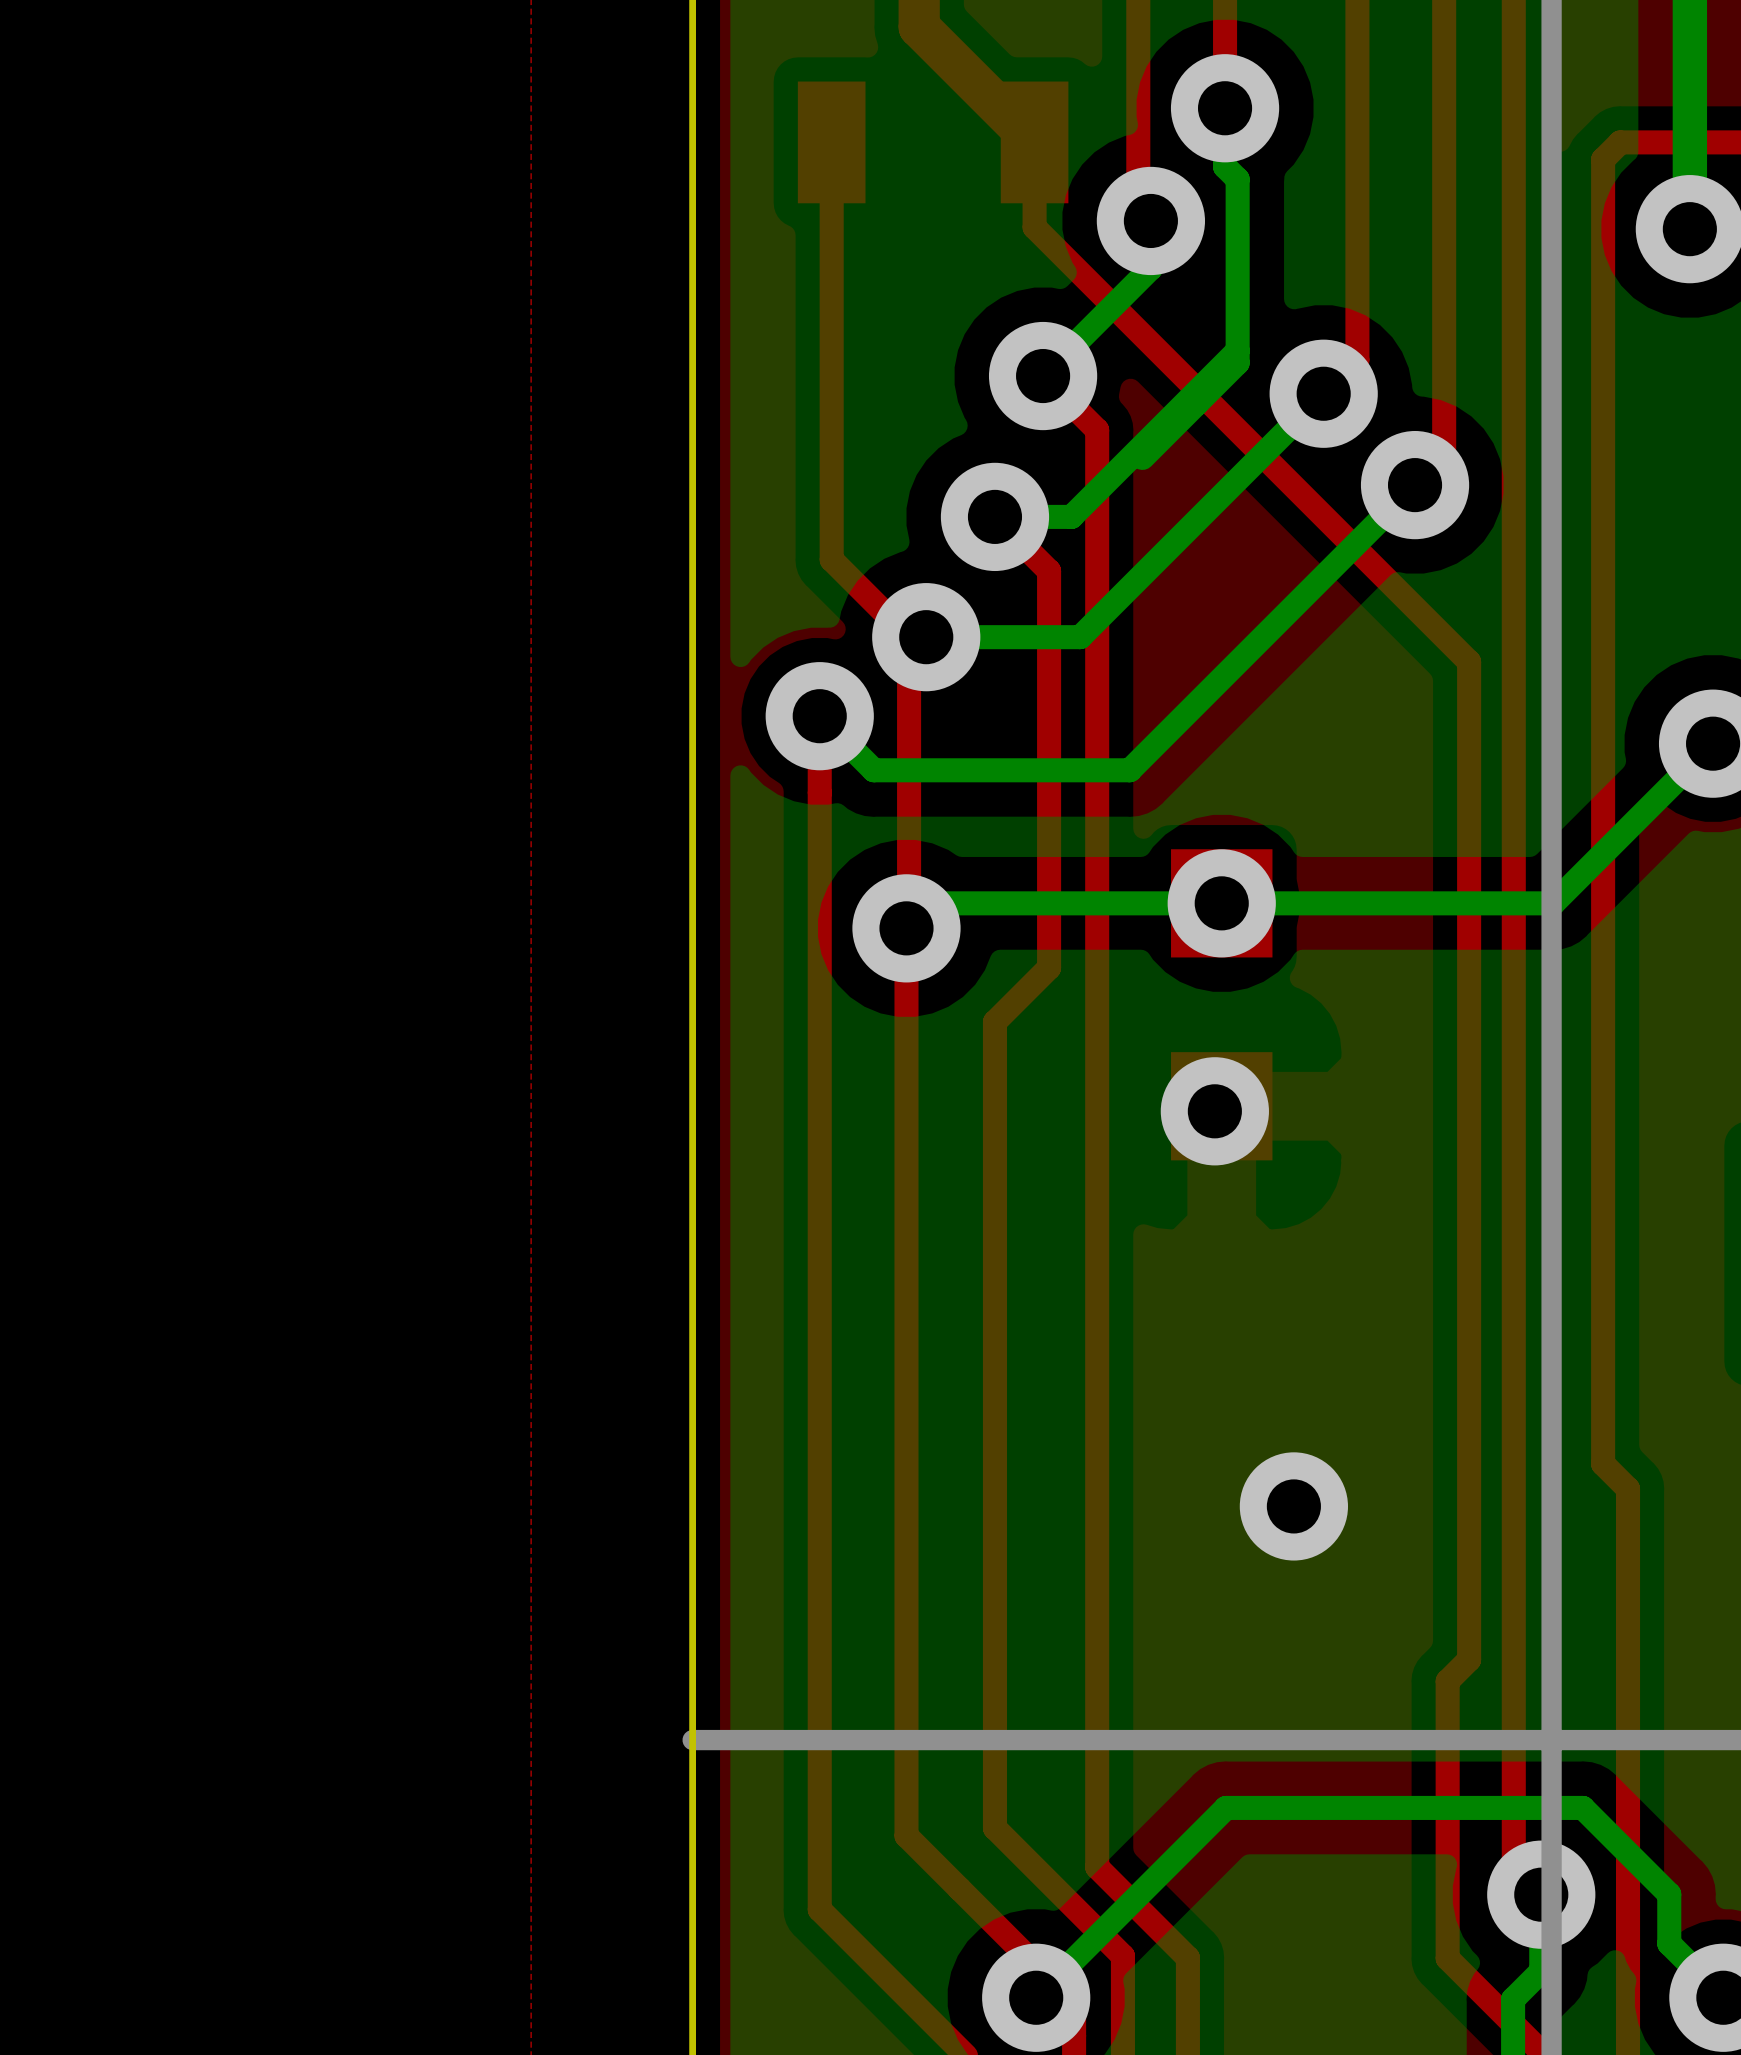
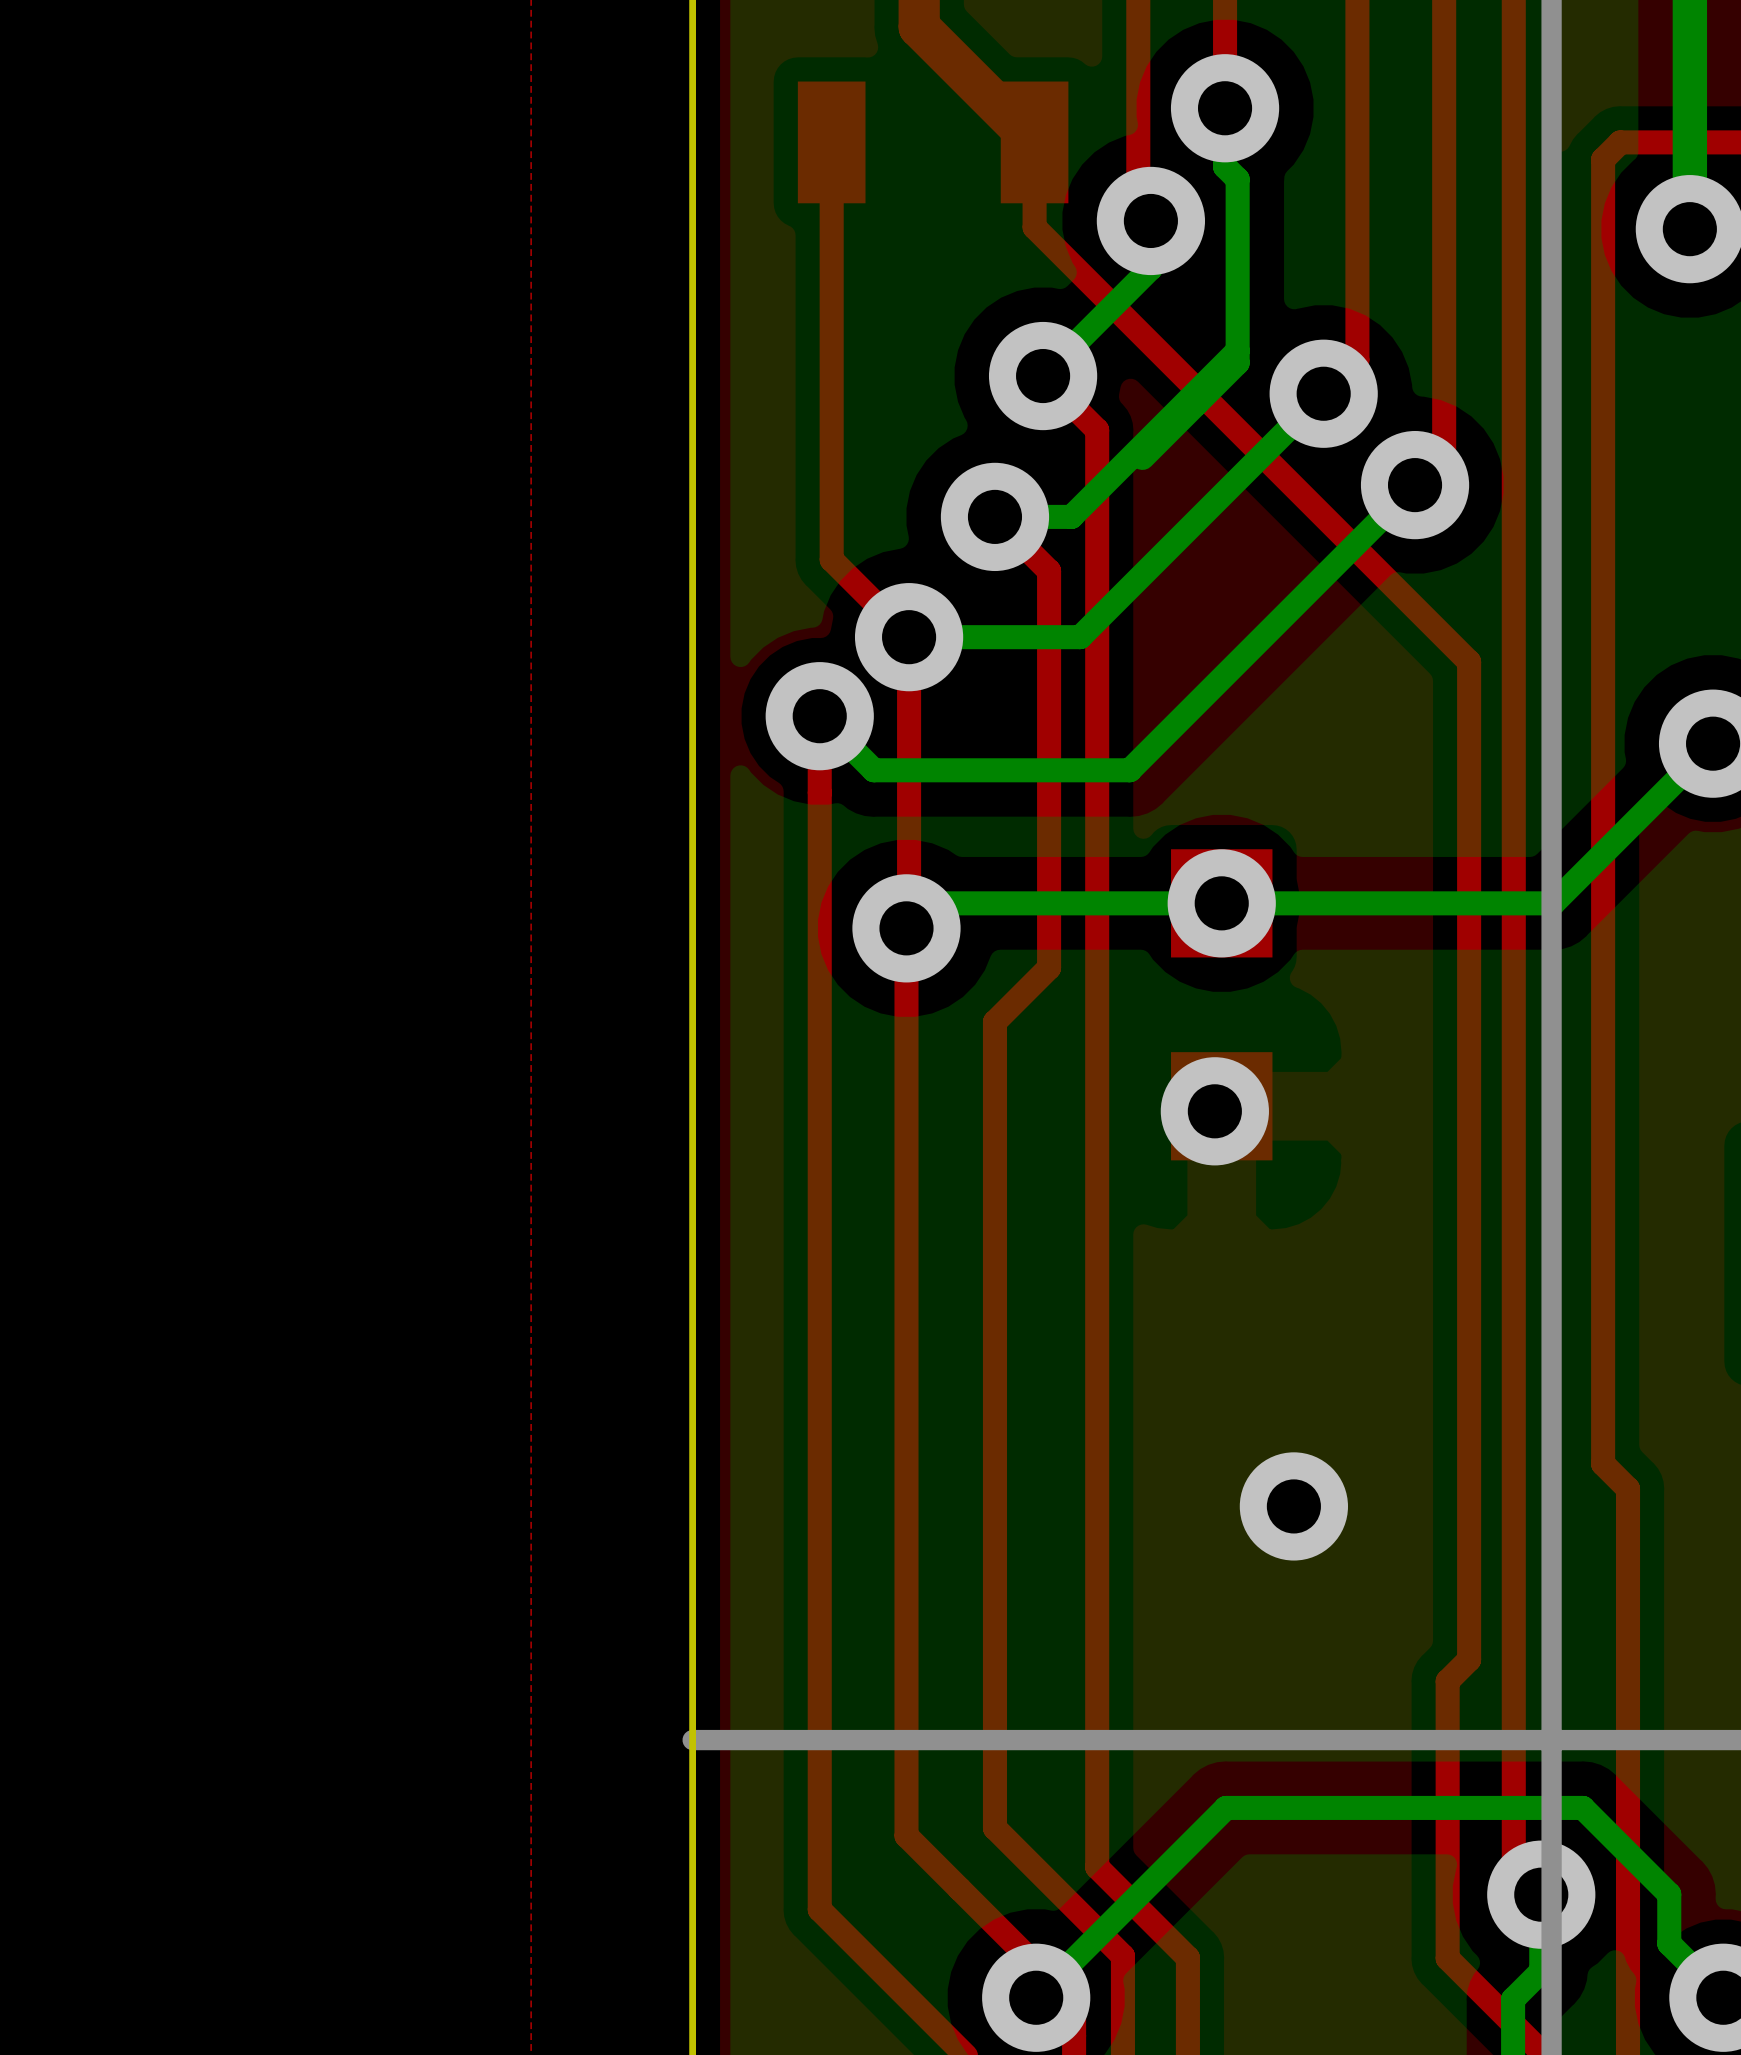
via position: (926, 637) -> (909, 637)

